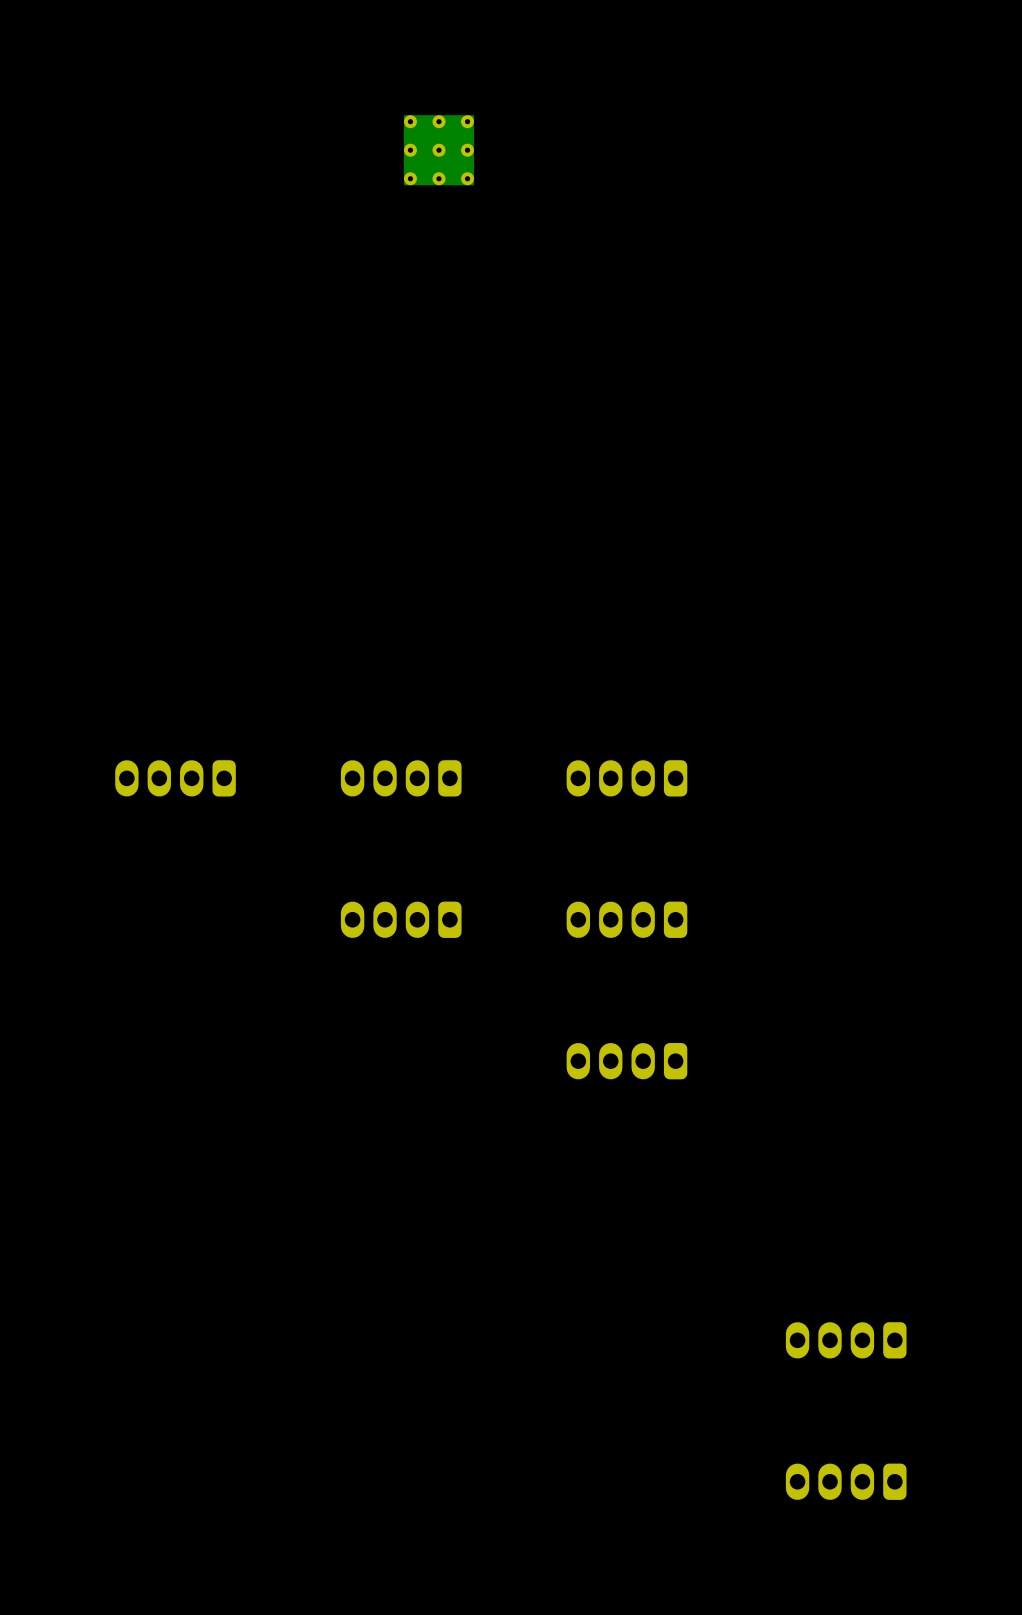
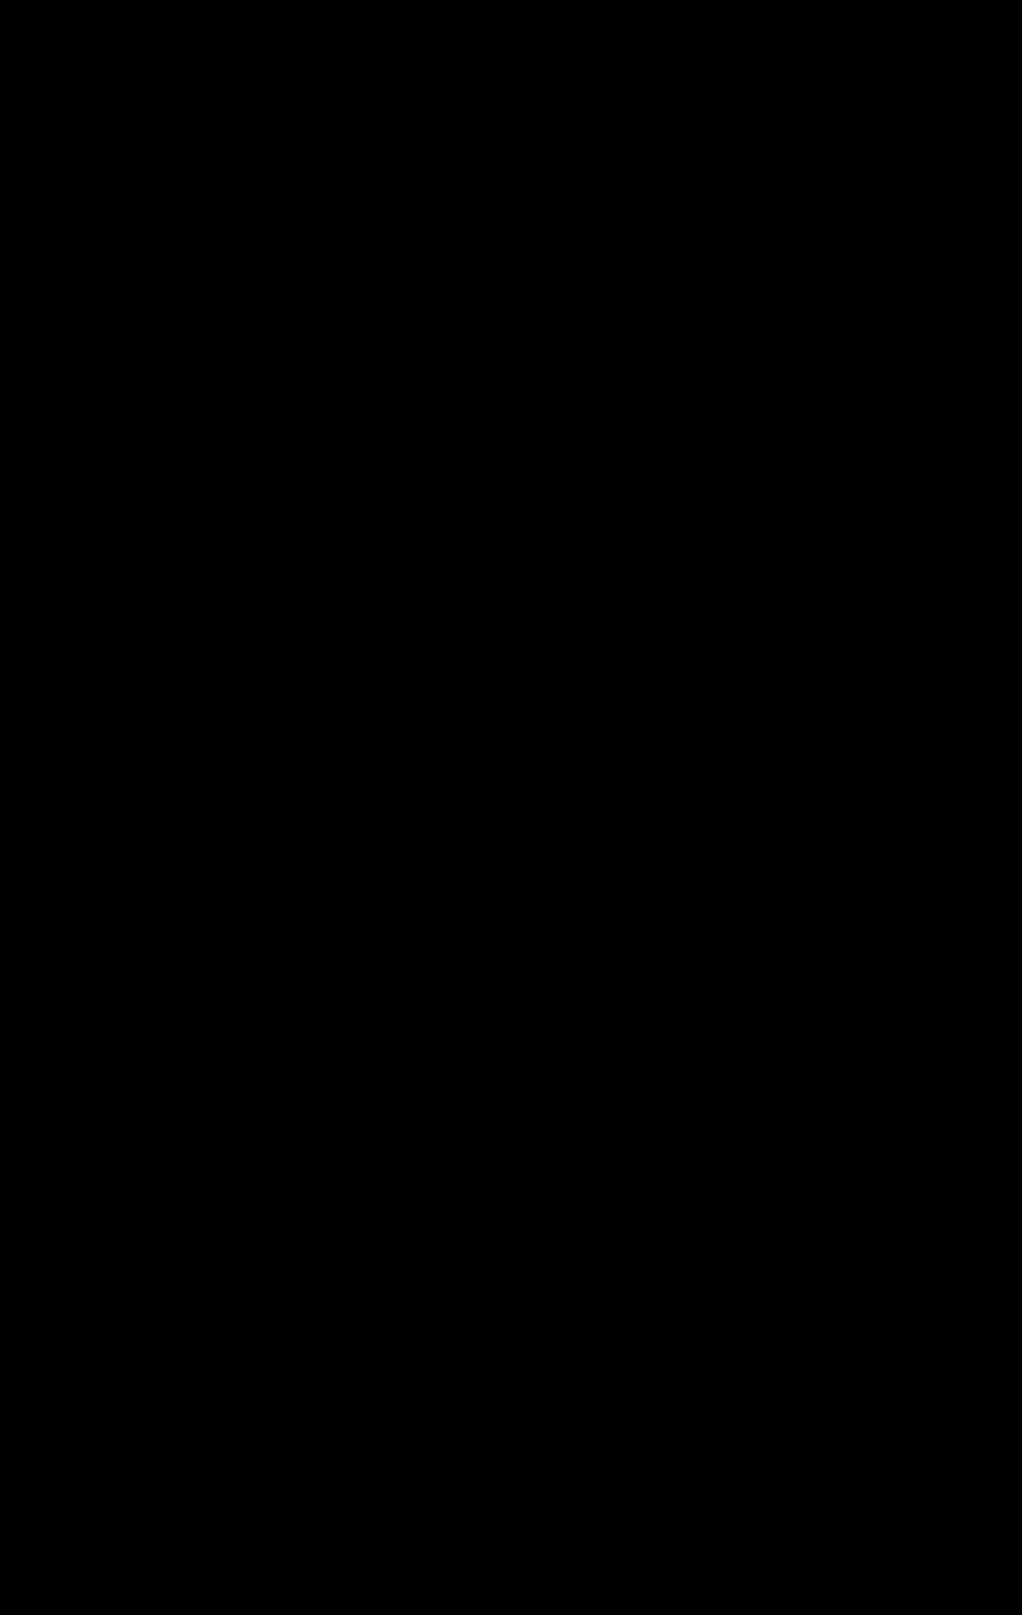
part: (438, 150) -> none
part: (175, 778) -> none
part: (401, 778) -> none
part: (626, 778) -> none
part: (401, 919) -> none
part: (626, 919) -> none
part: (626, 1061) -> none
part: (846, 1340) -> none
part: (846, 1481) -> none

